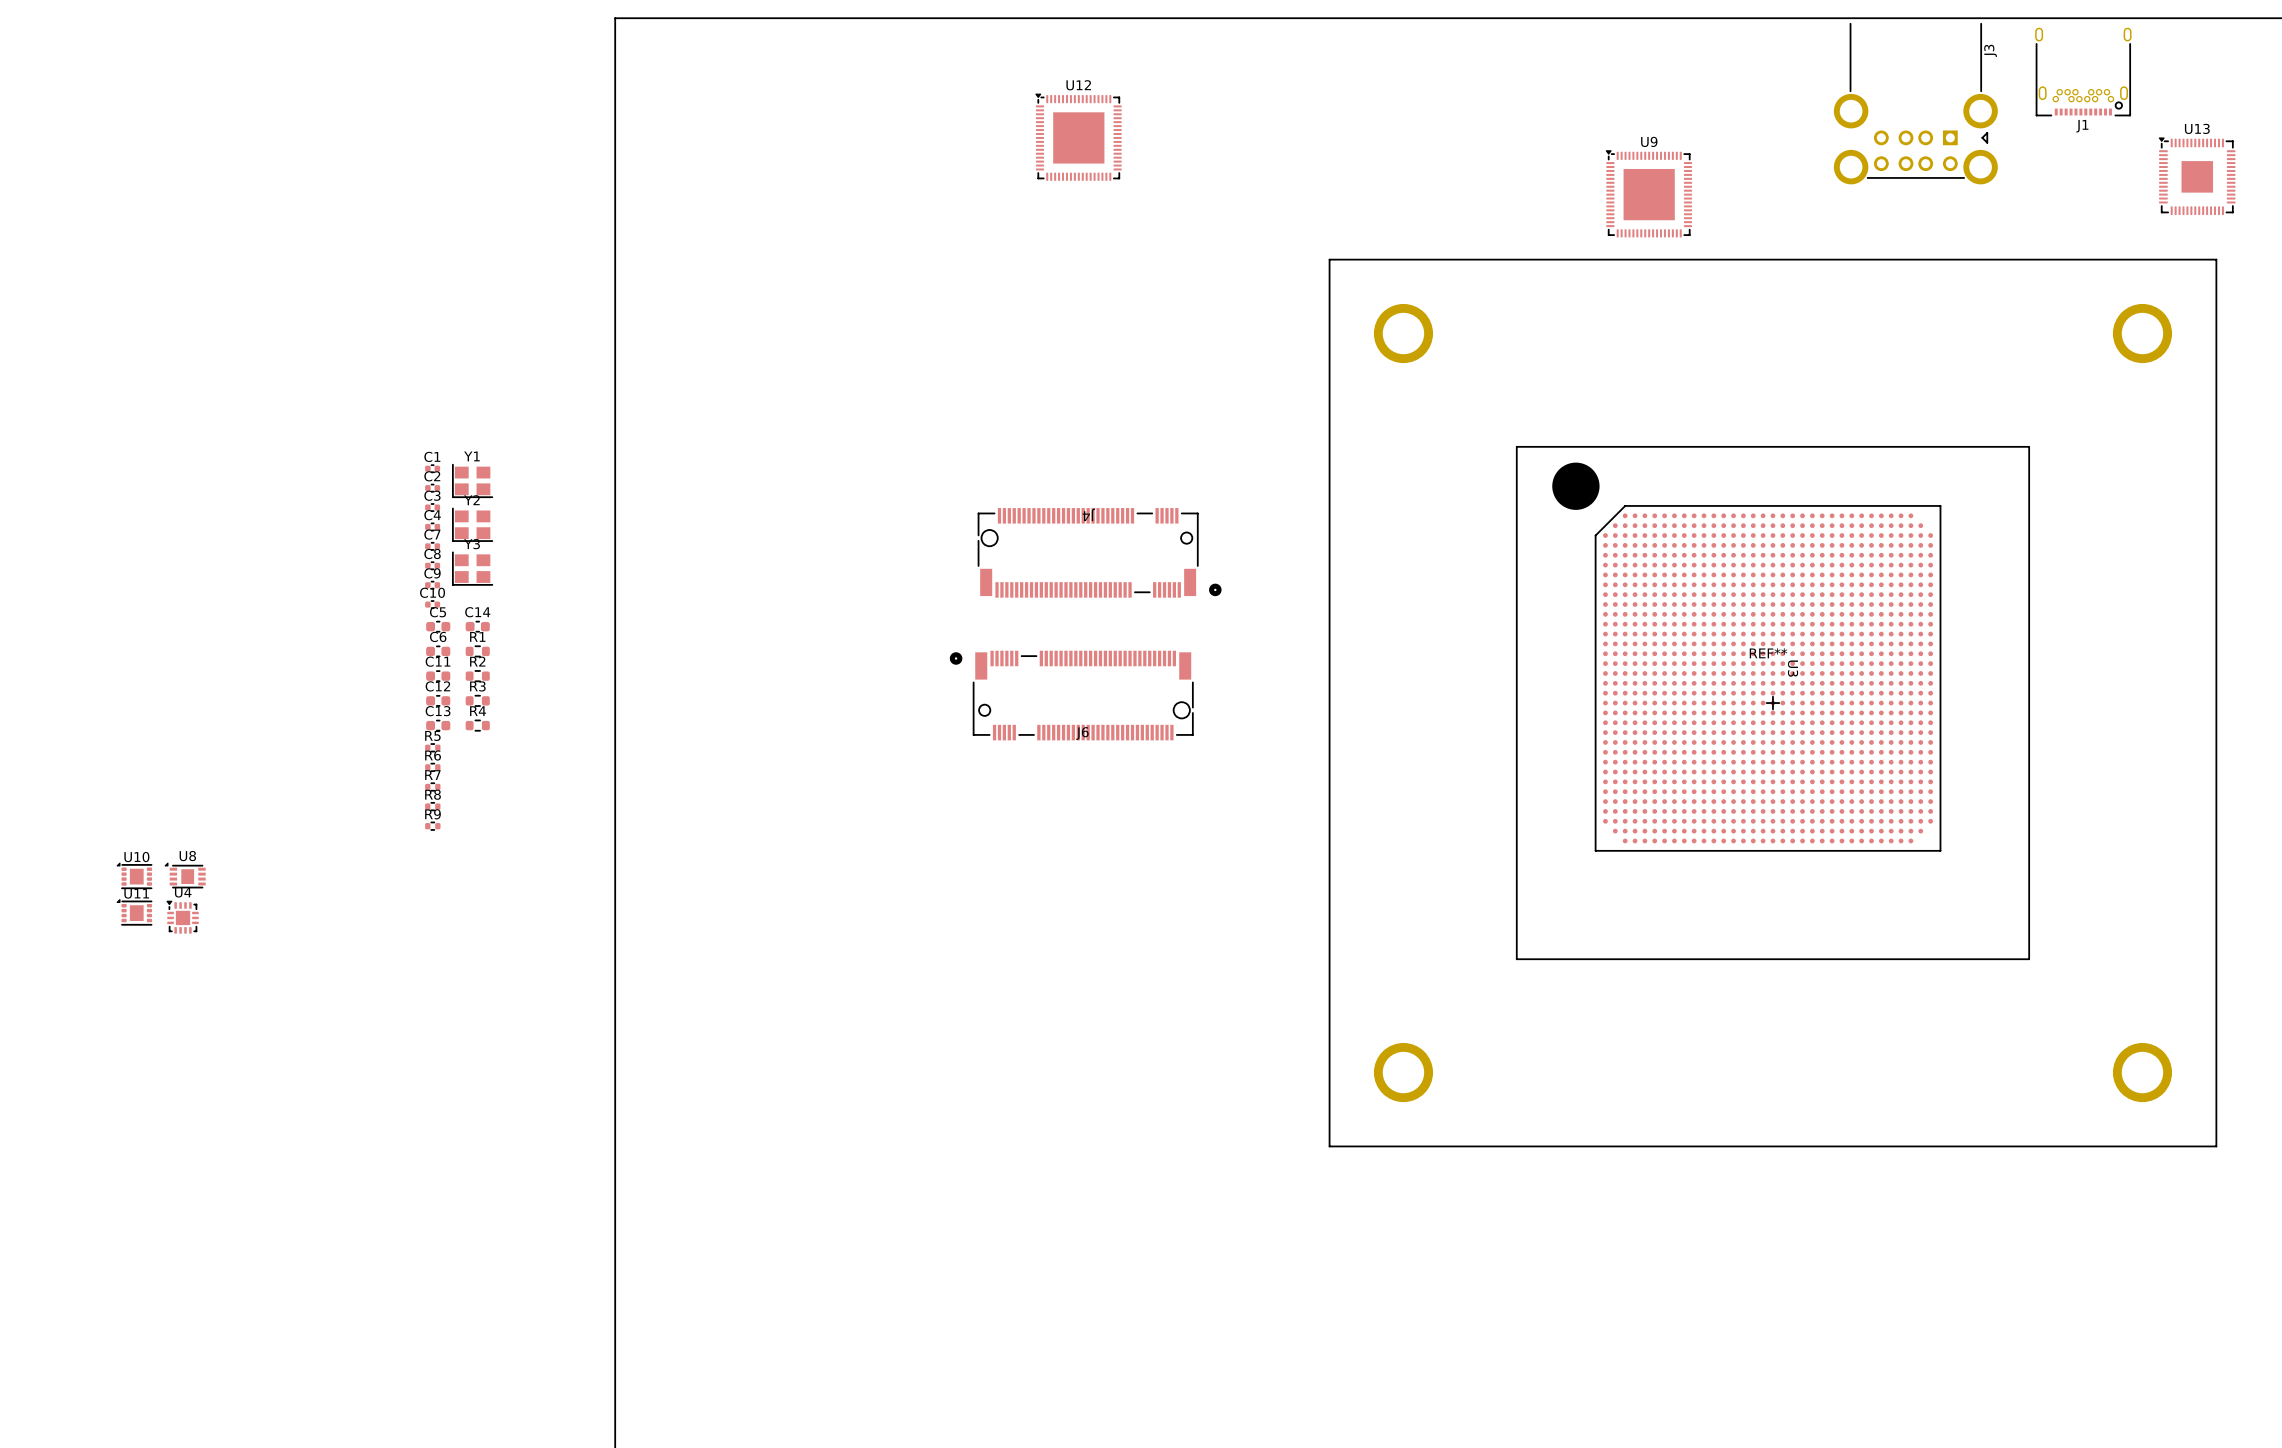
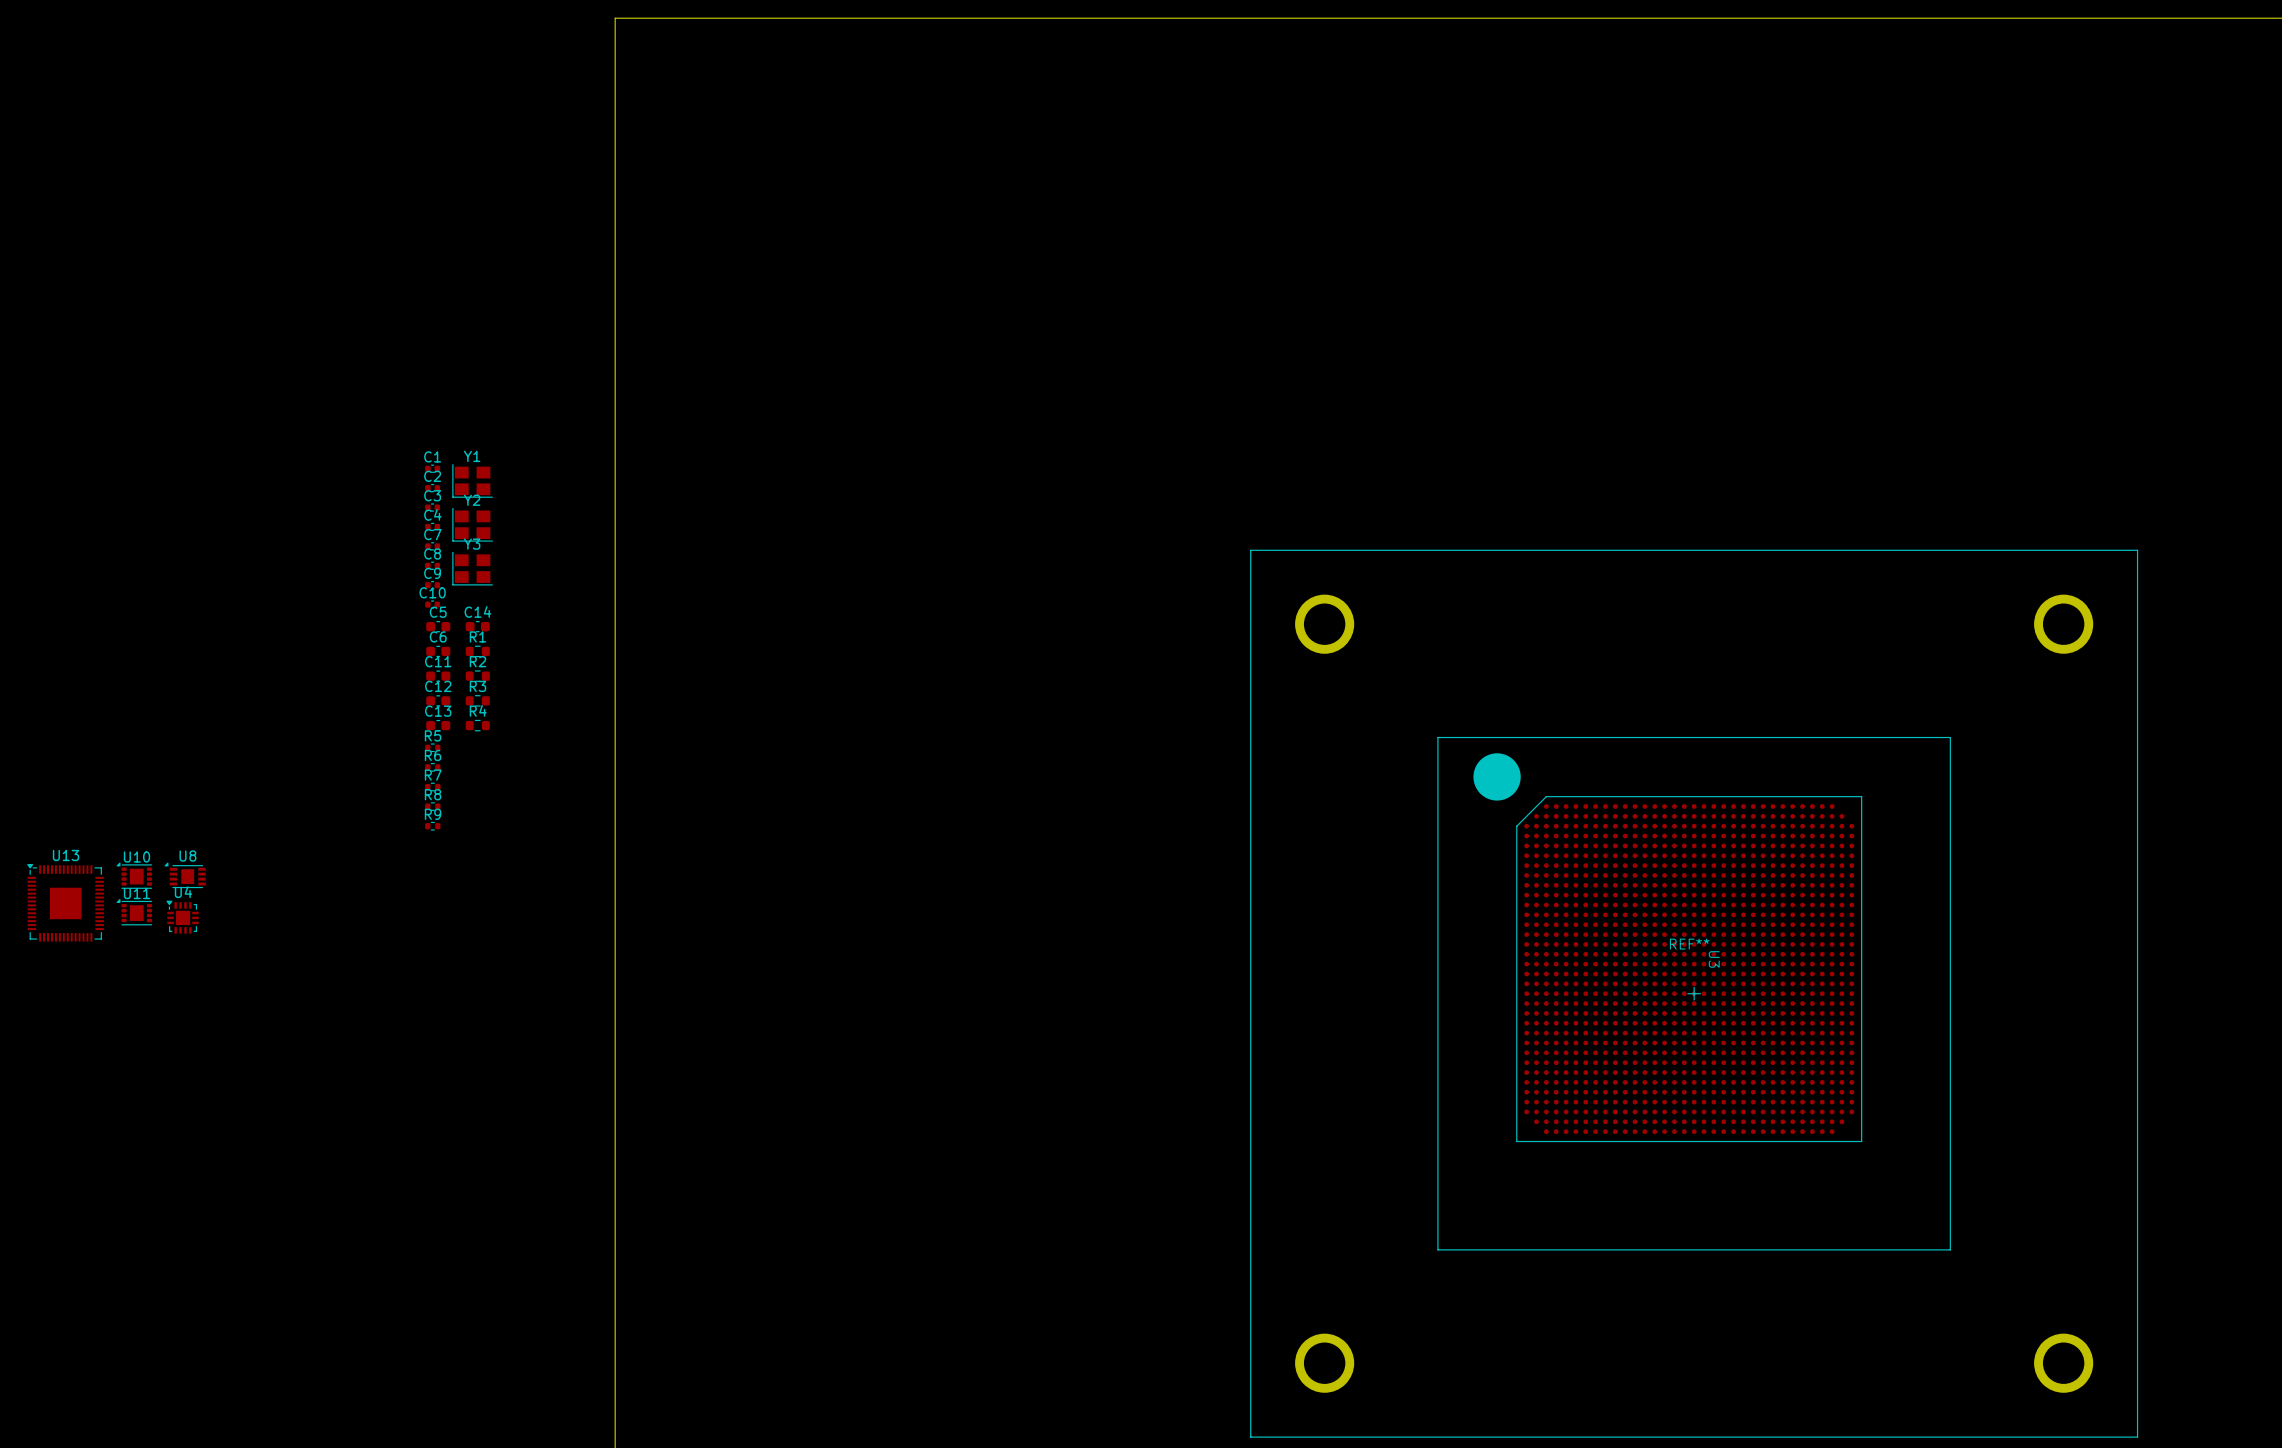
J1: (2083, 71) -> none
J3: (1915, 103) -> none
U12: (1078, 137) -> none
U13 position: (2197, 176) -> (65, 902)
U9: (1648, 193) -> none
J4: (1099, 552) -> none
U3 position: (1746, 656) -> (1667, 947)
J6: (1071, 695) -> none
REF**: (1772, 703) -> none
REF**: none -> (1694, 993)

